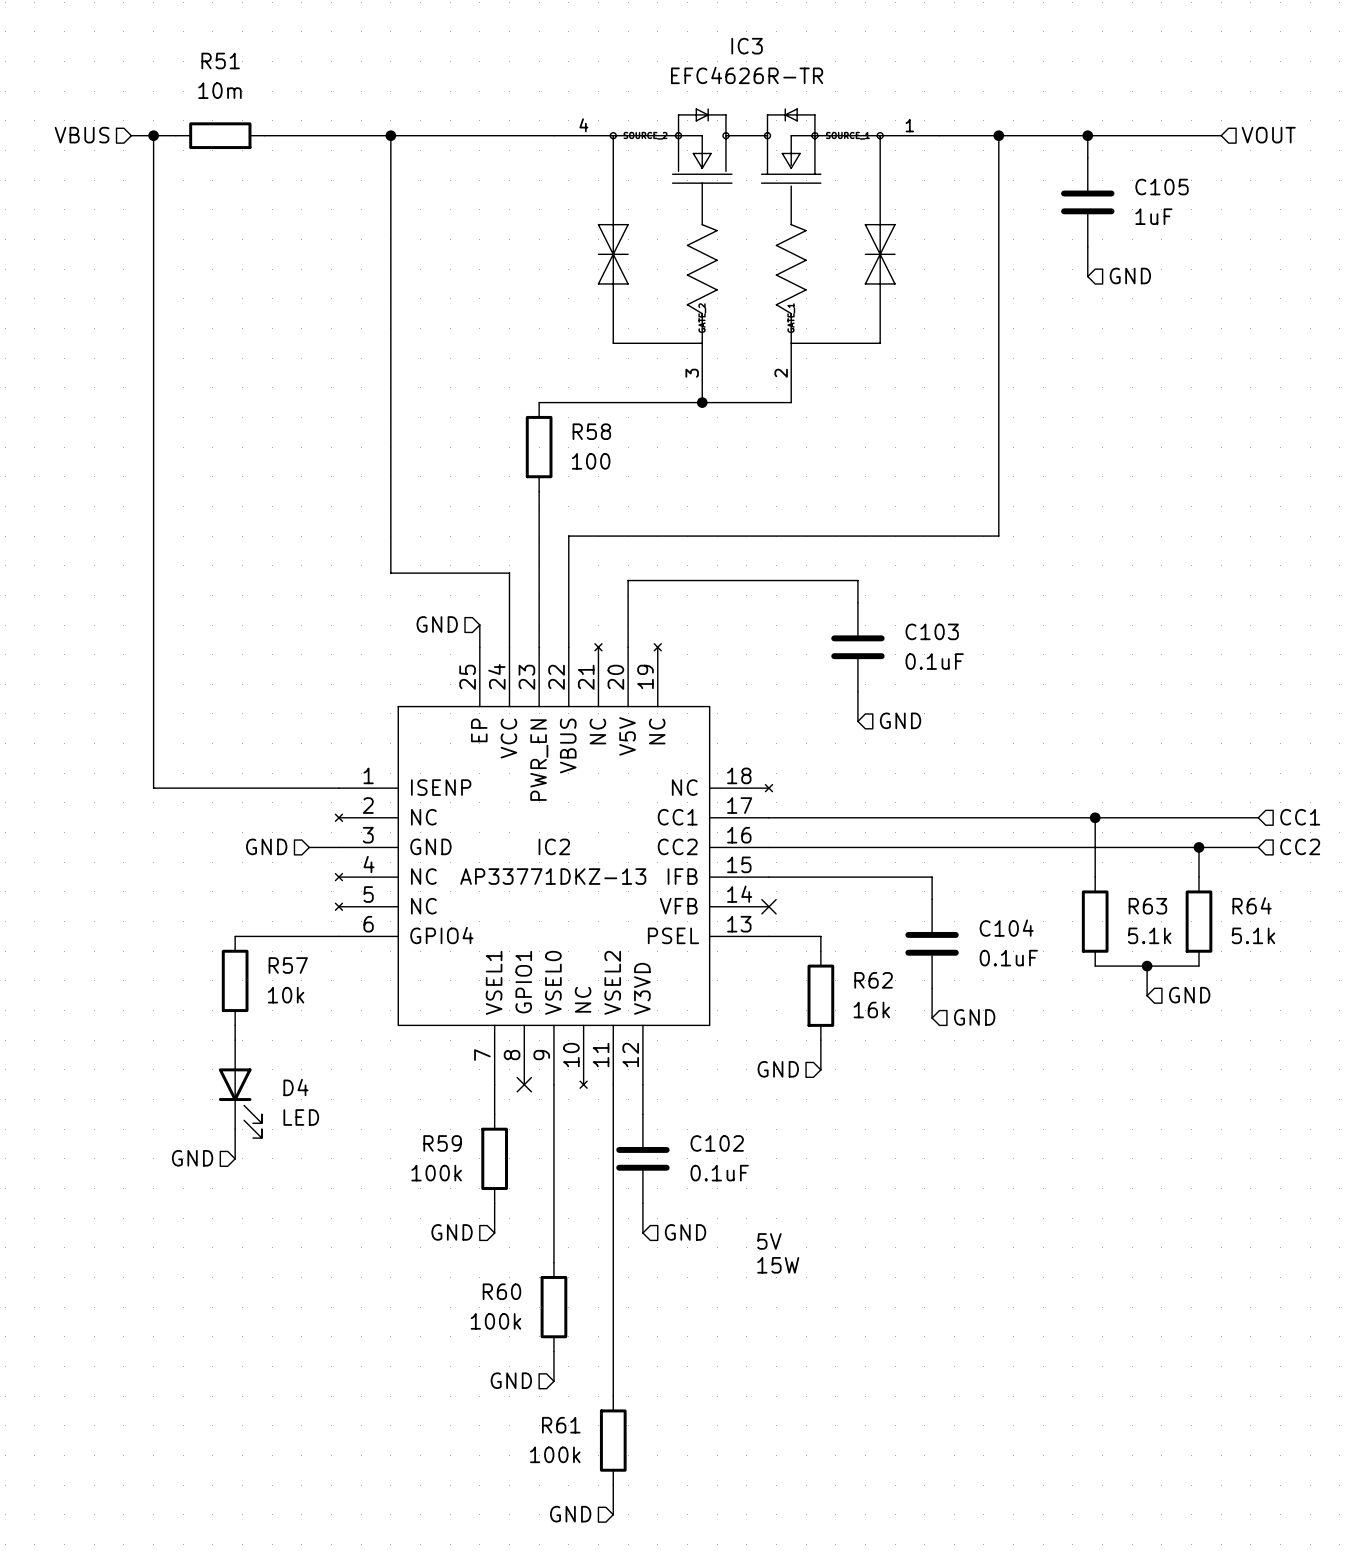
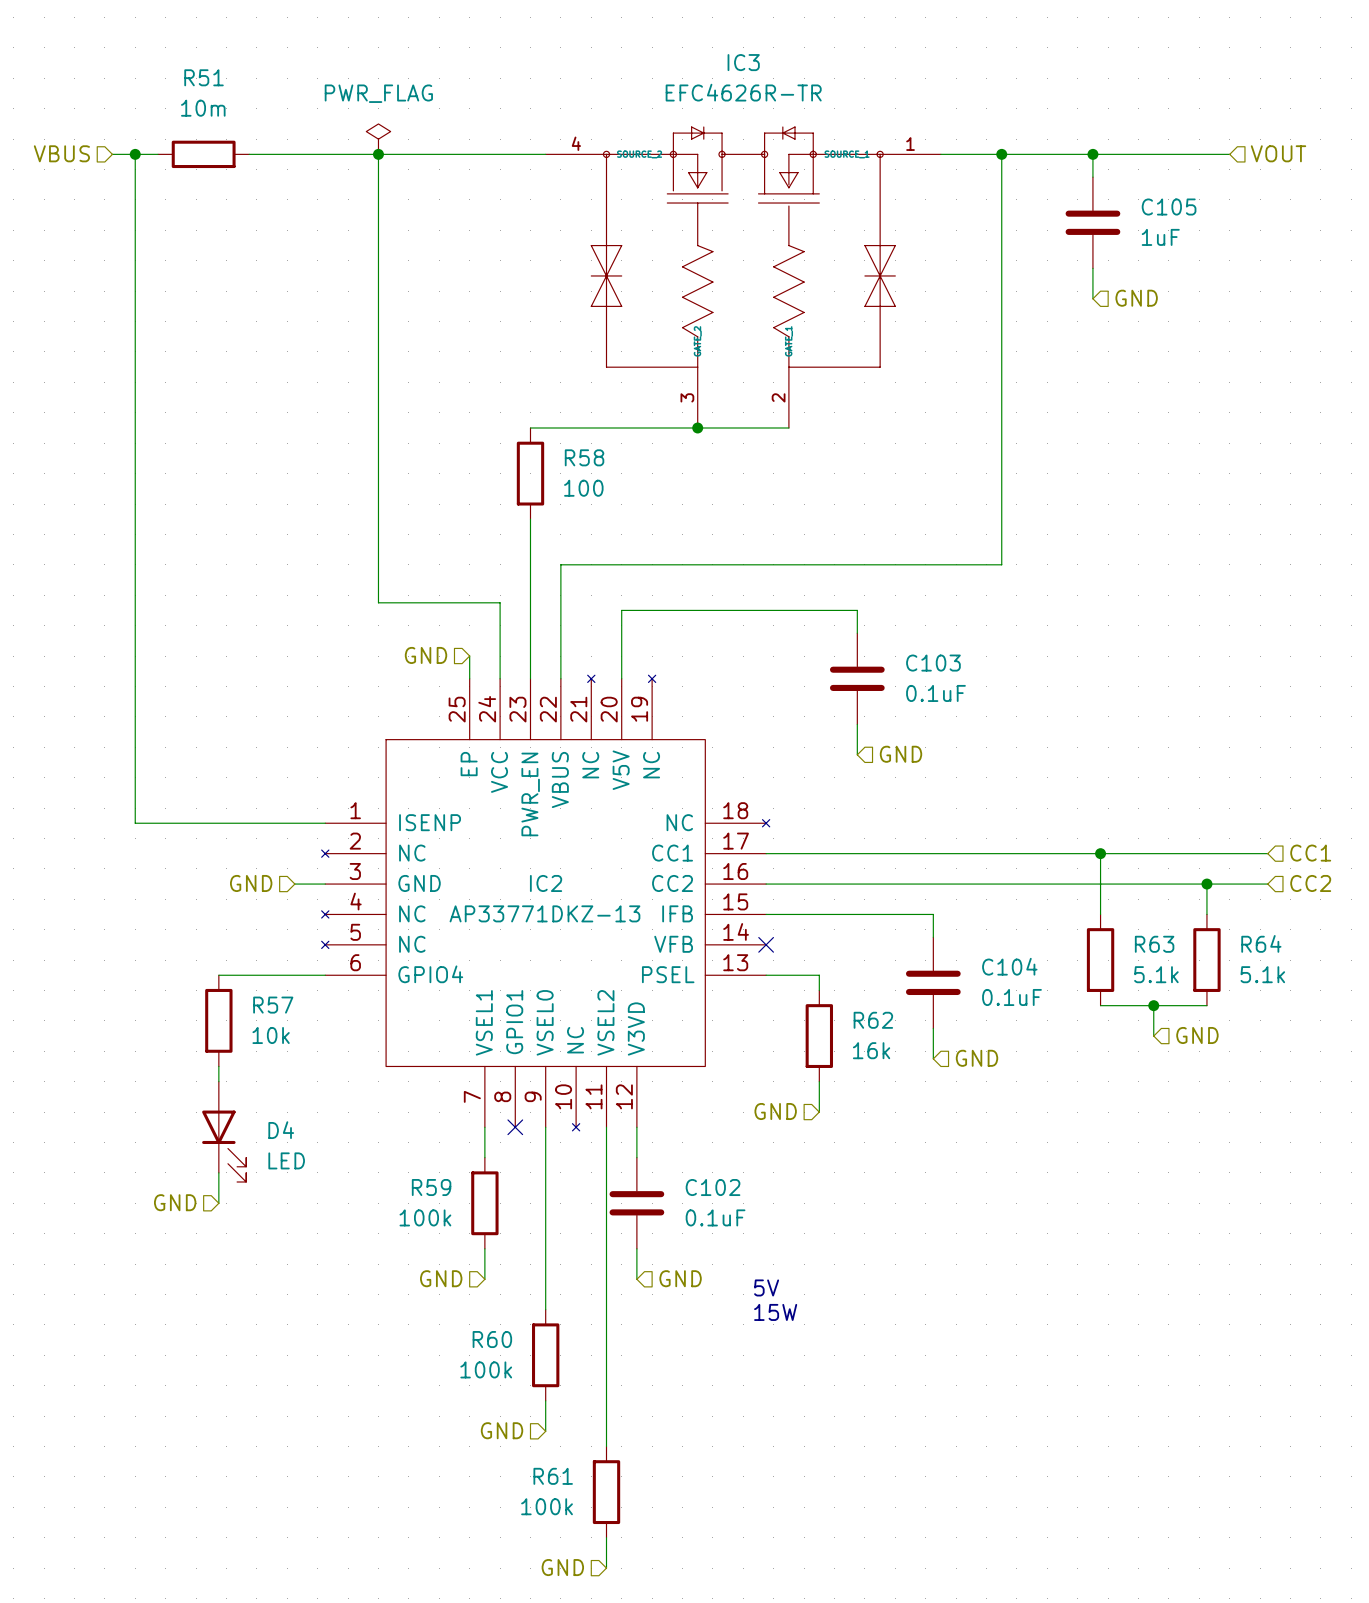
power symbol: none -> PWR_FLAG (378, 139)

